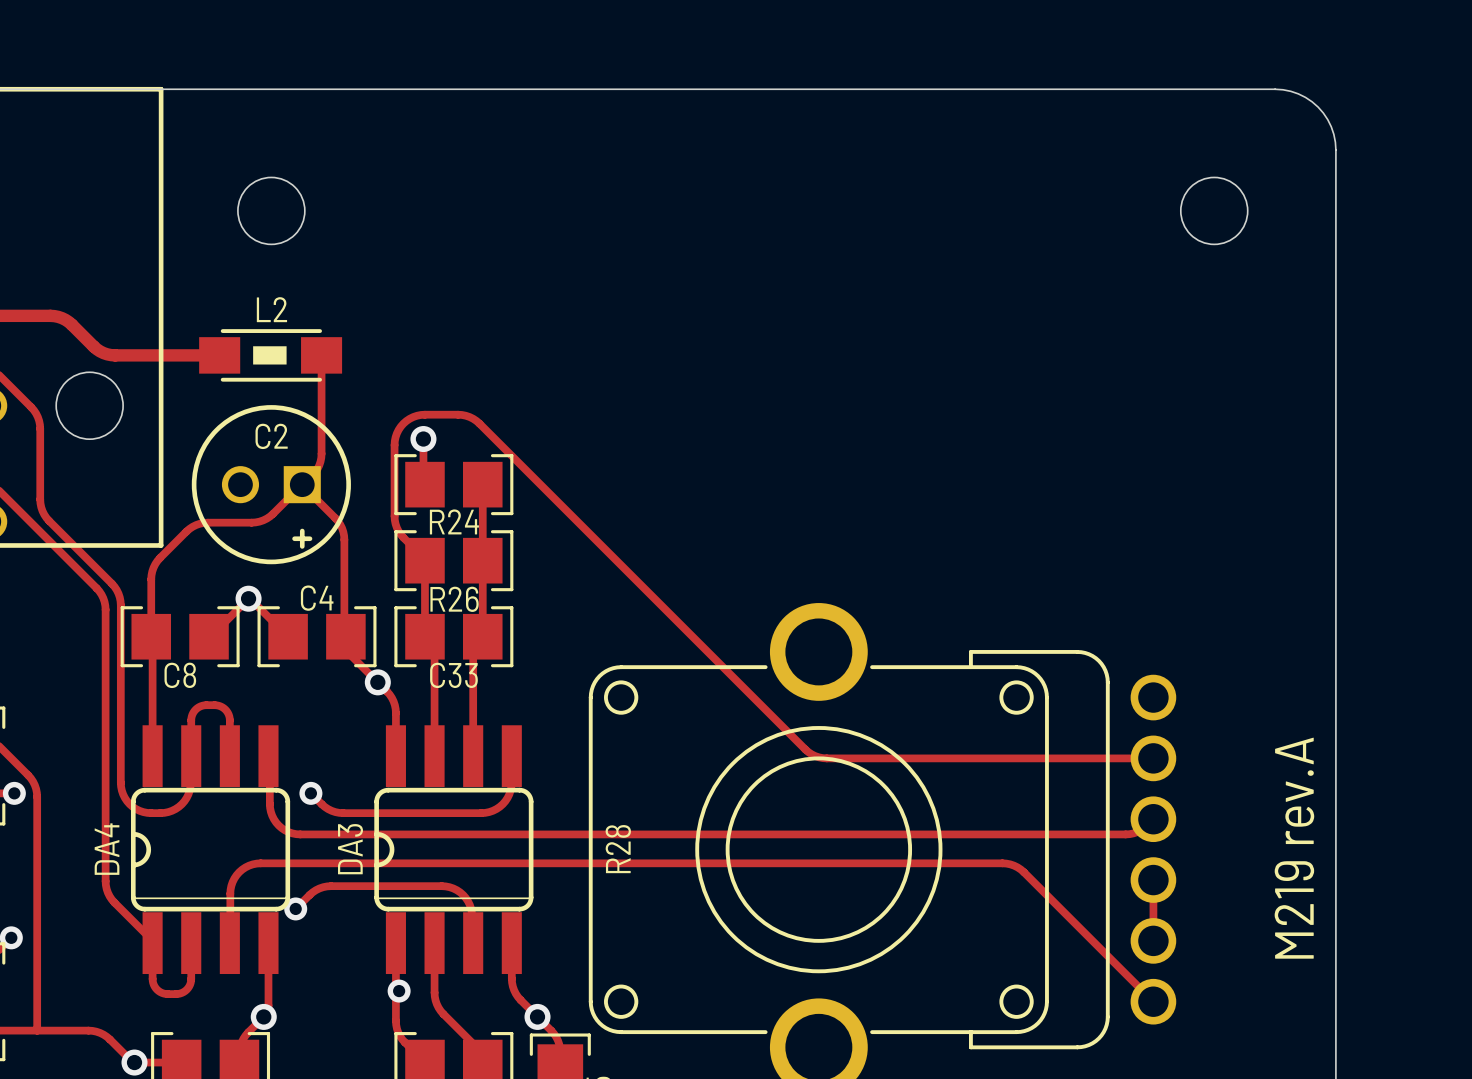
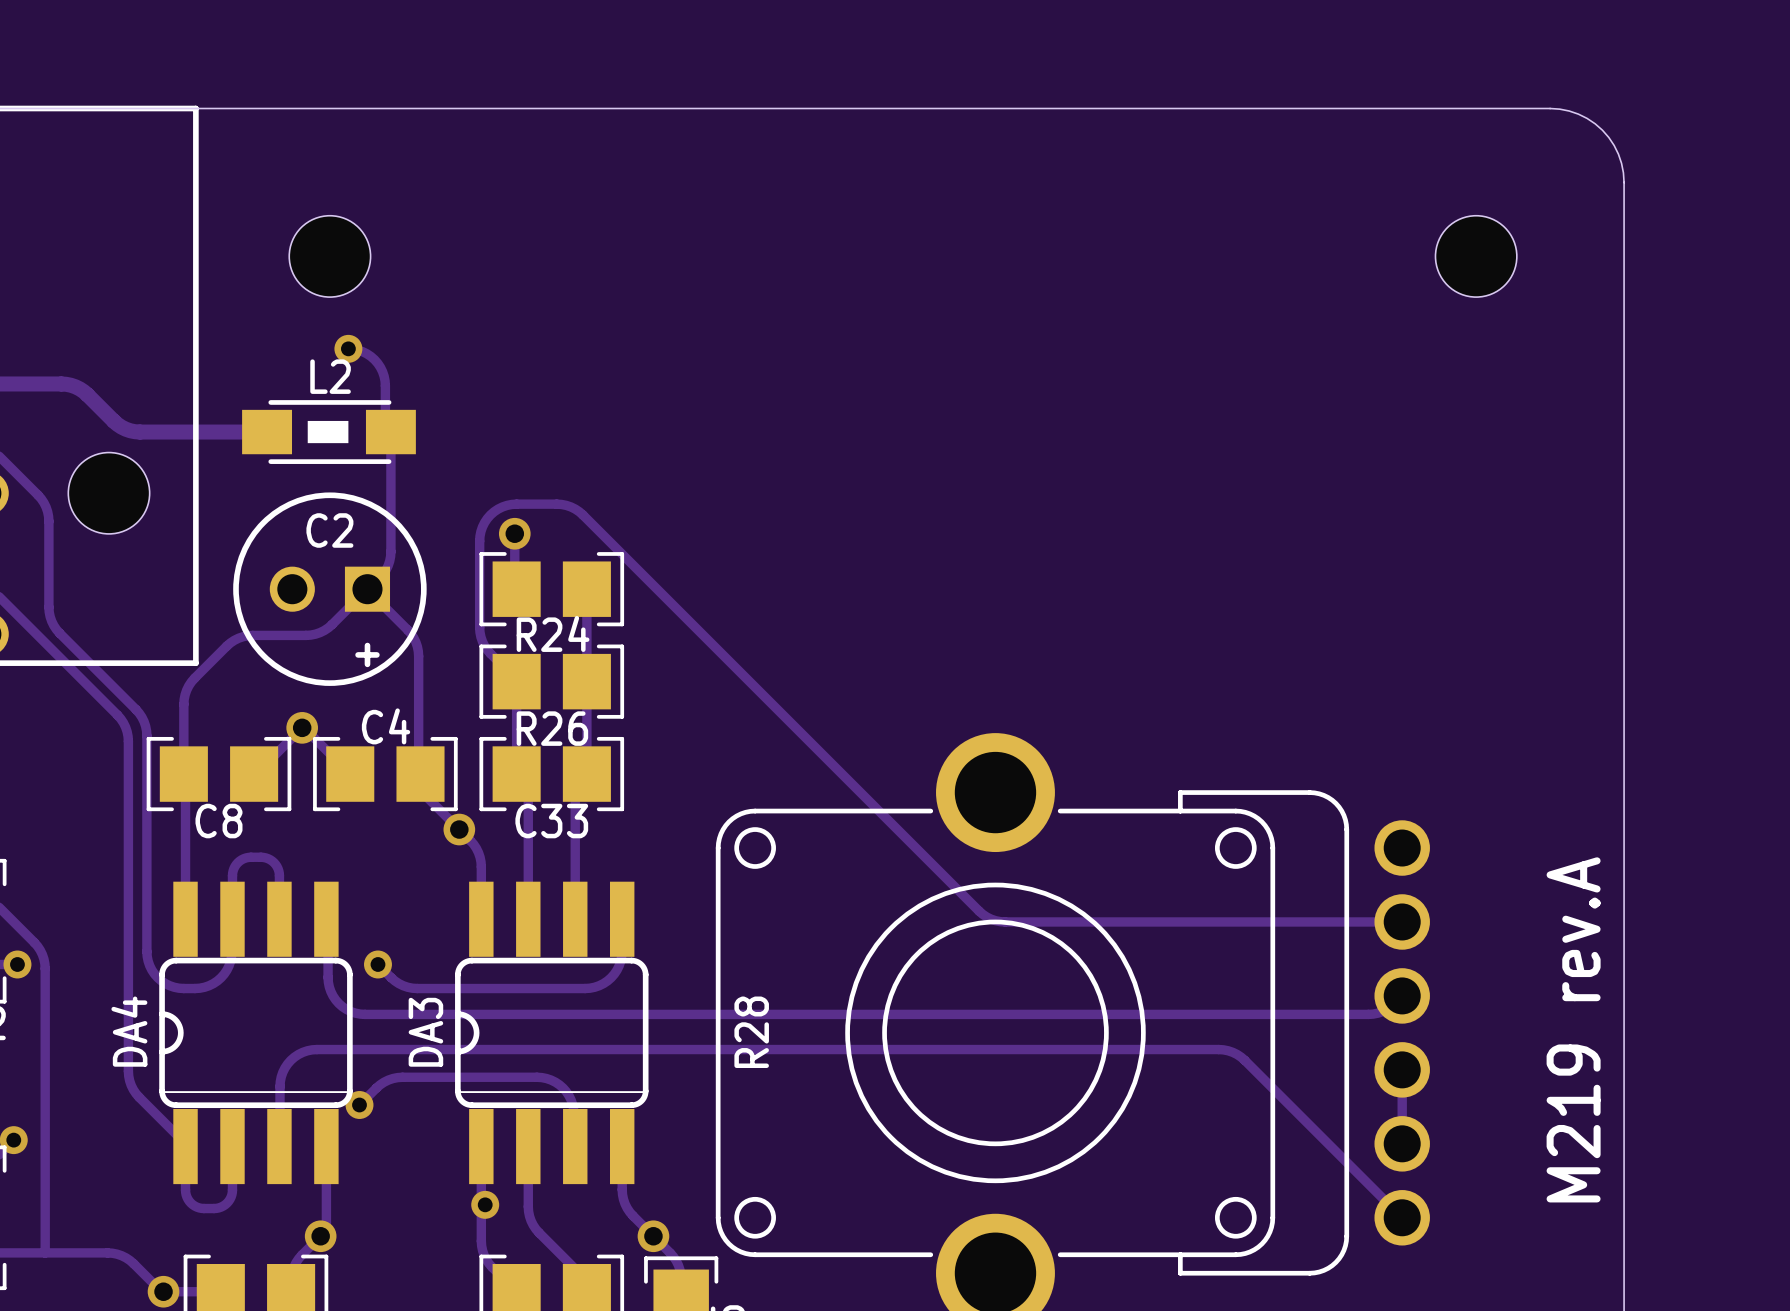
track: none -> (348, 348) (366, 353) (380, 367) (385, 381) (385, 426) (390, 432)
via: none -> (348, 348)

